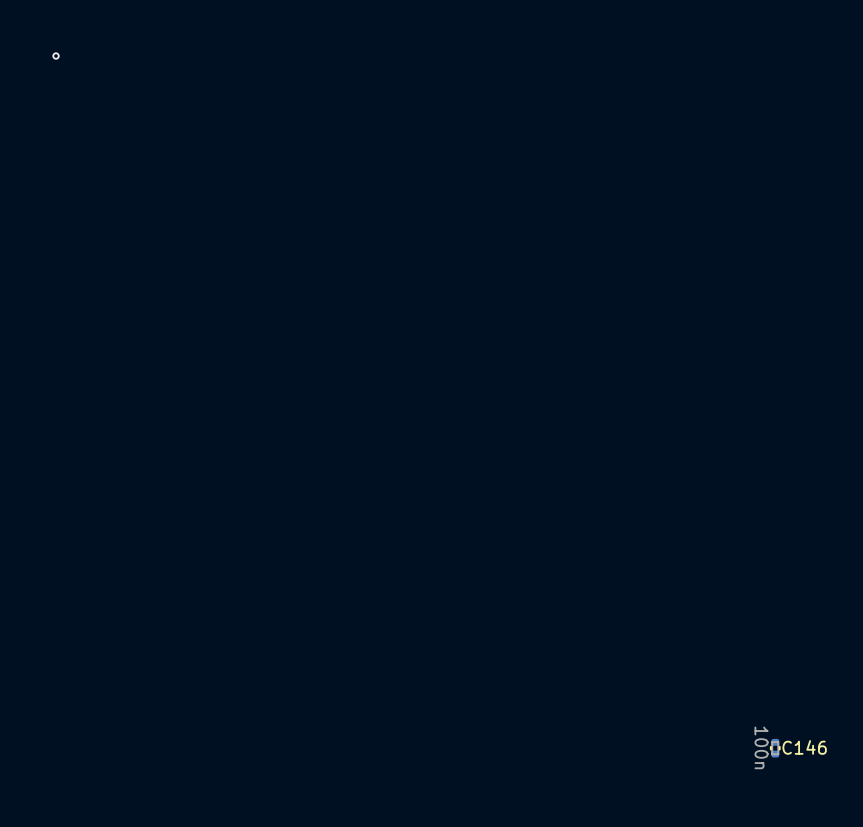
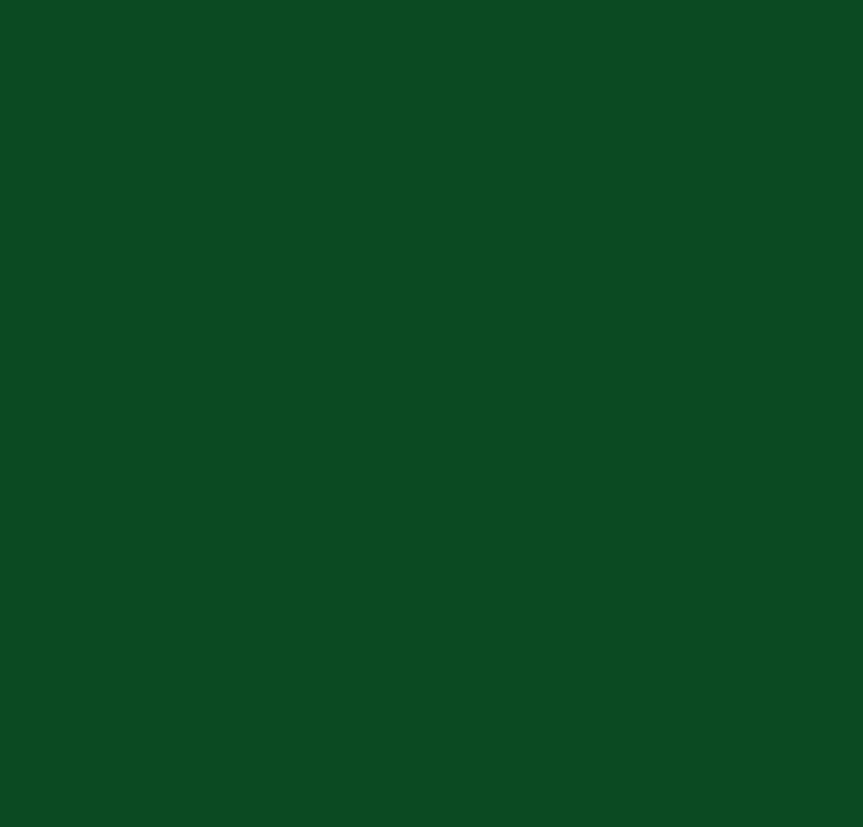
via: (56, 56) -> none
C146: 100n (775, 748) -> none

